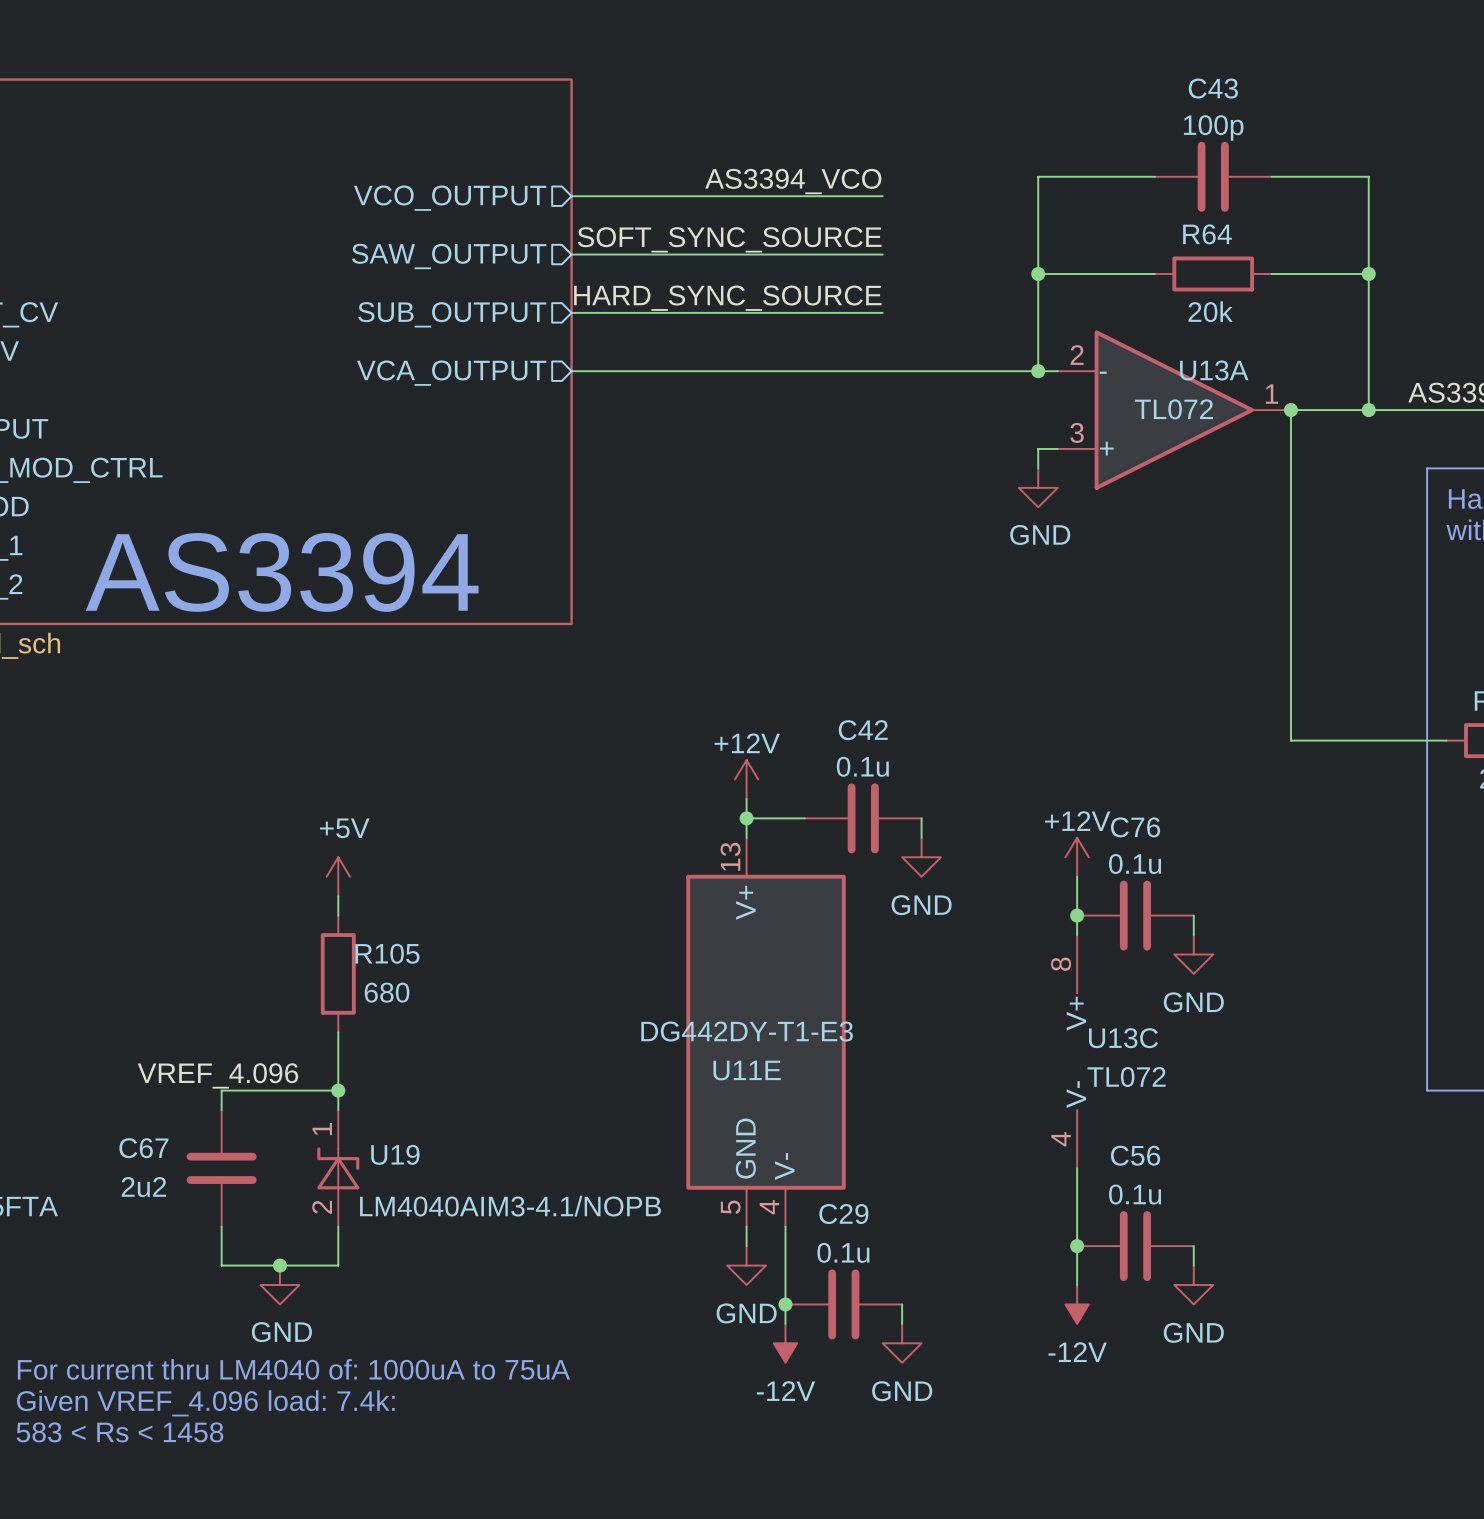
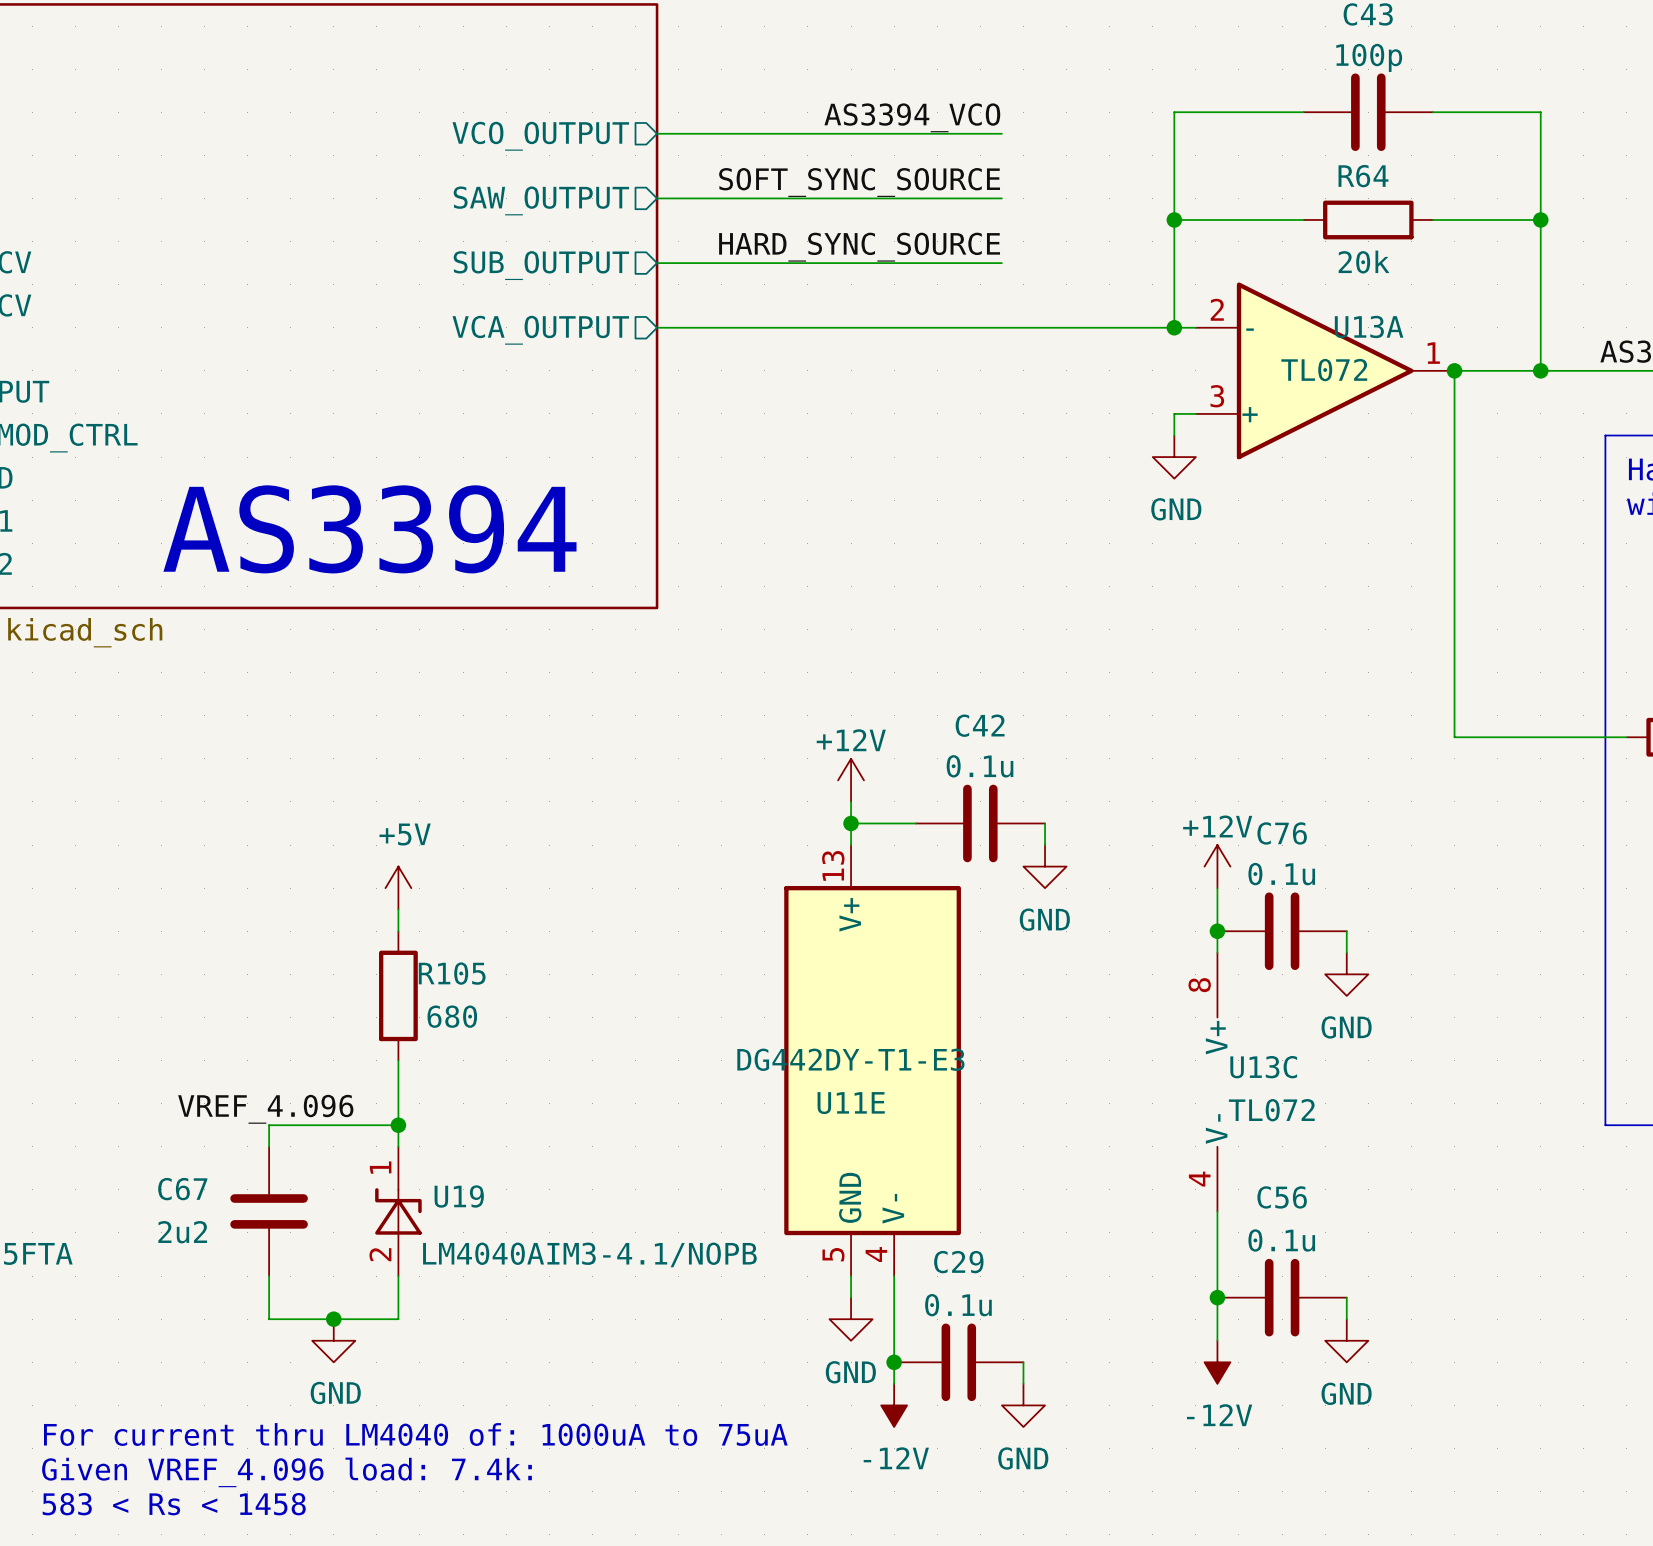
text position: AS3394 (282, 572) -> AS3394 (369, 529)

